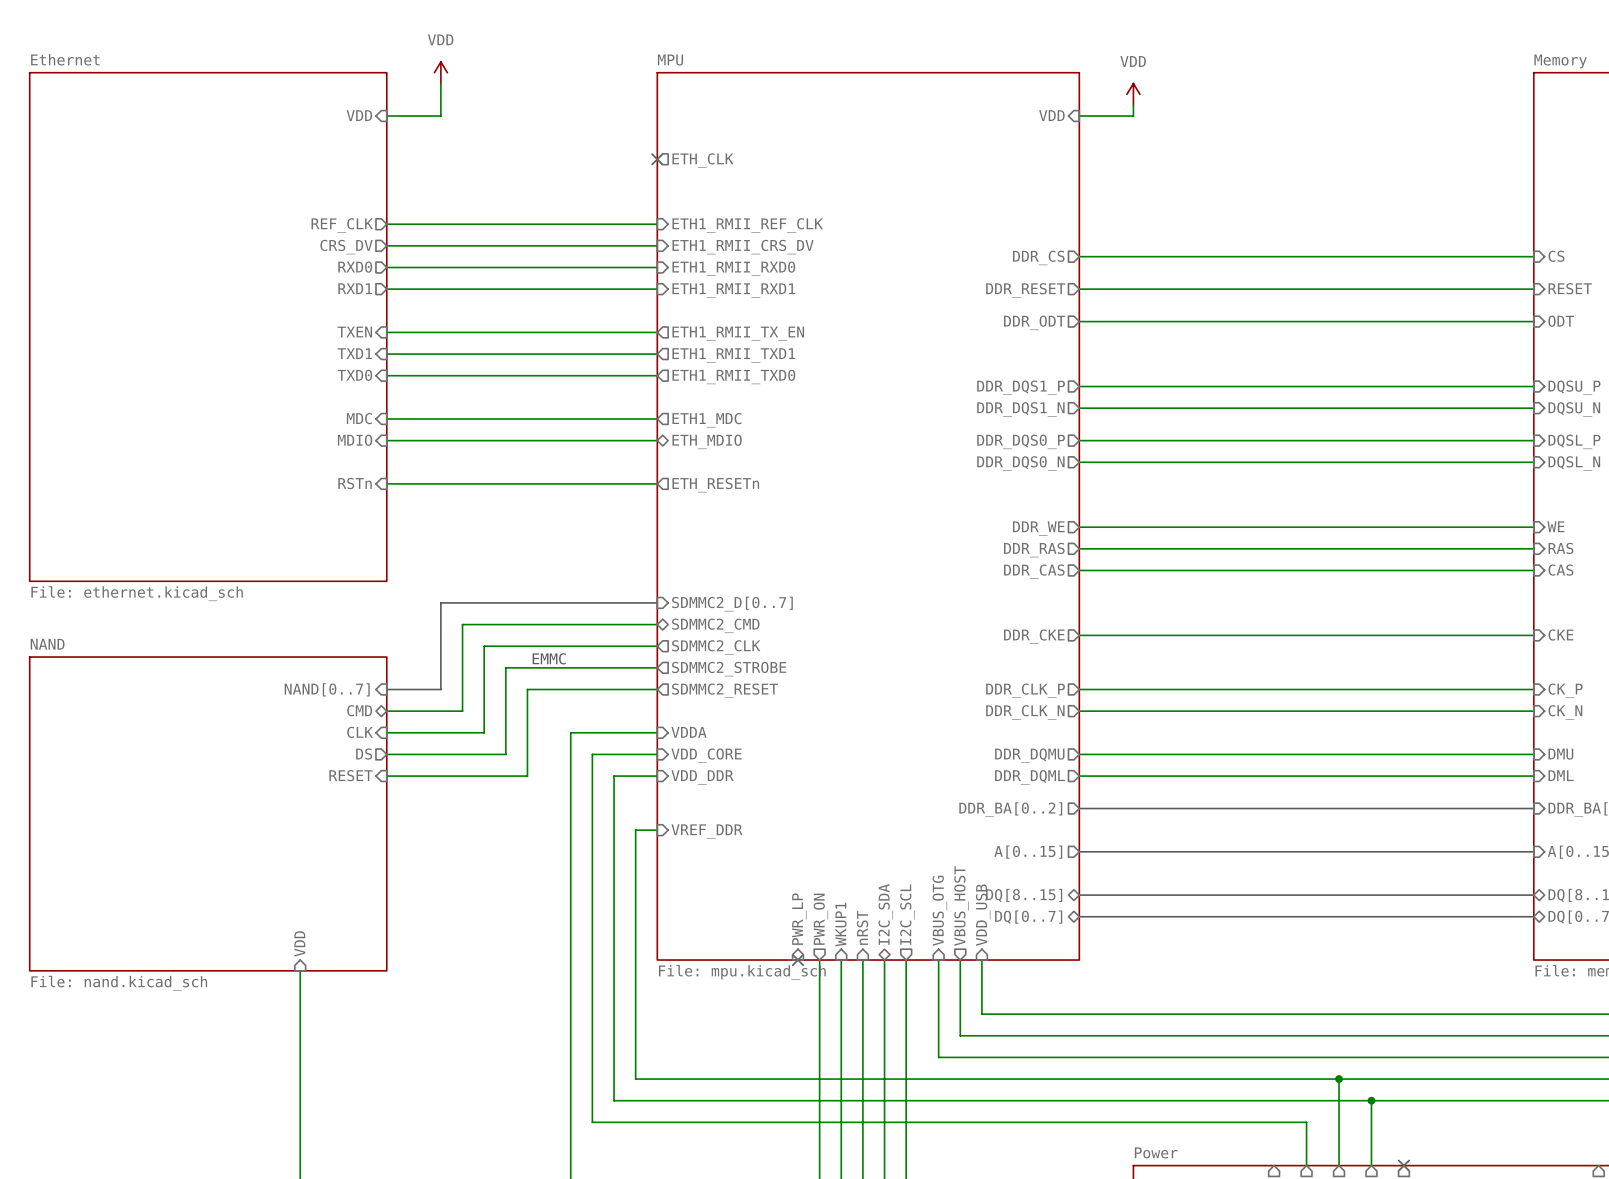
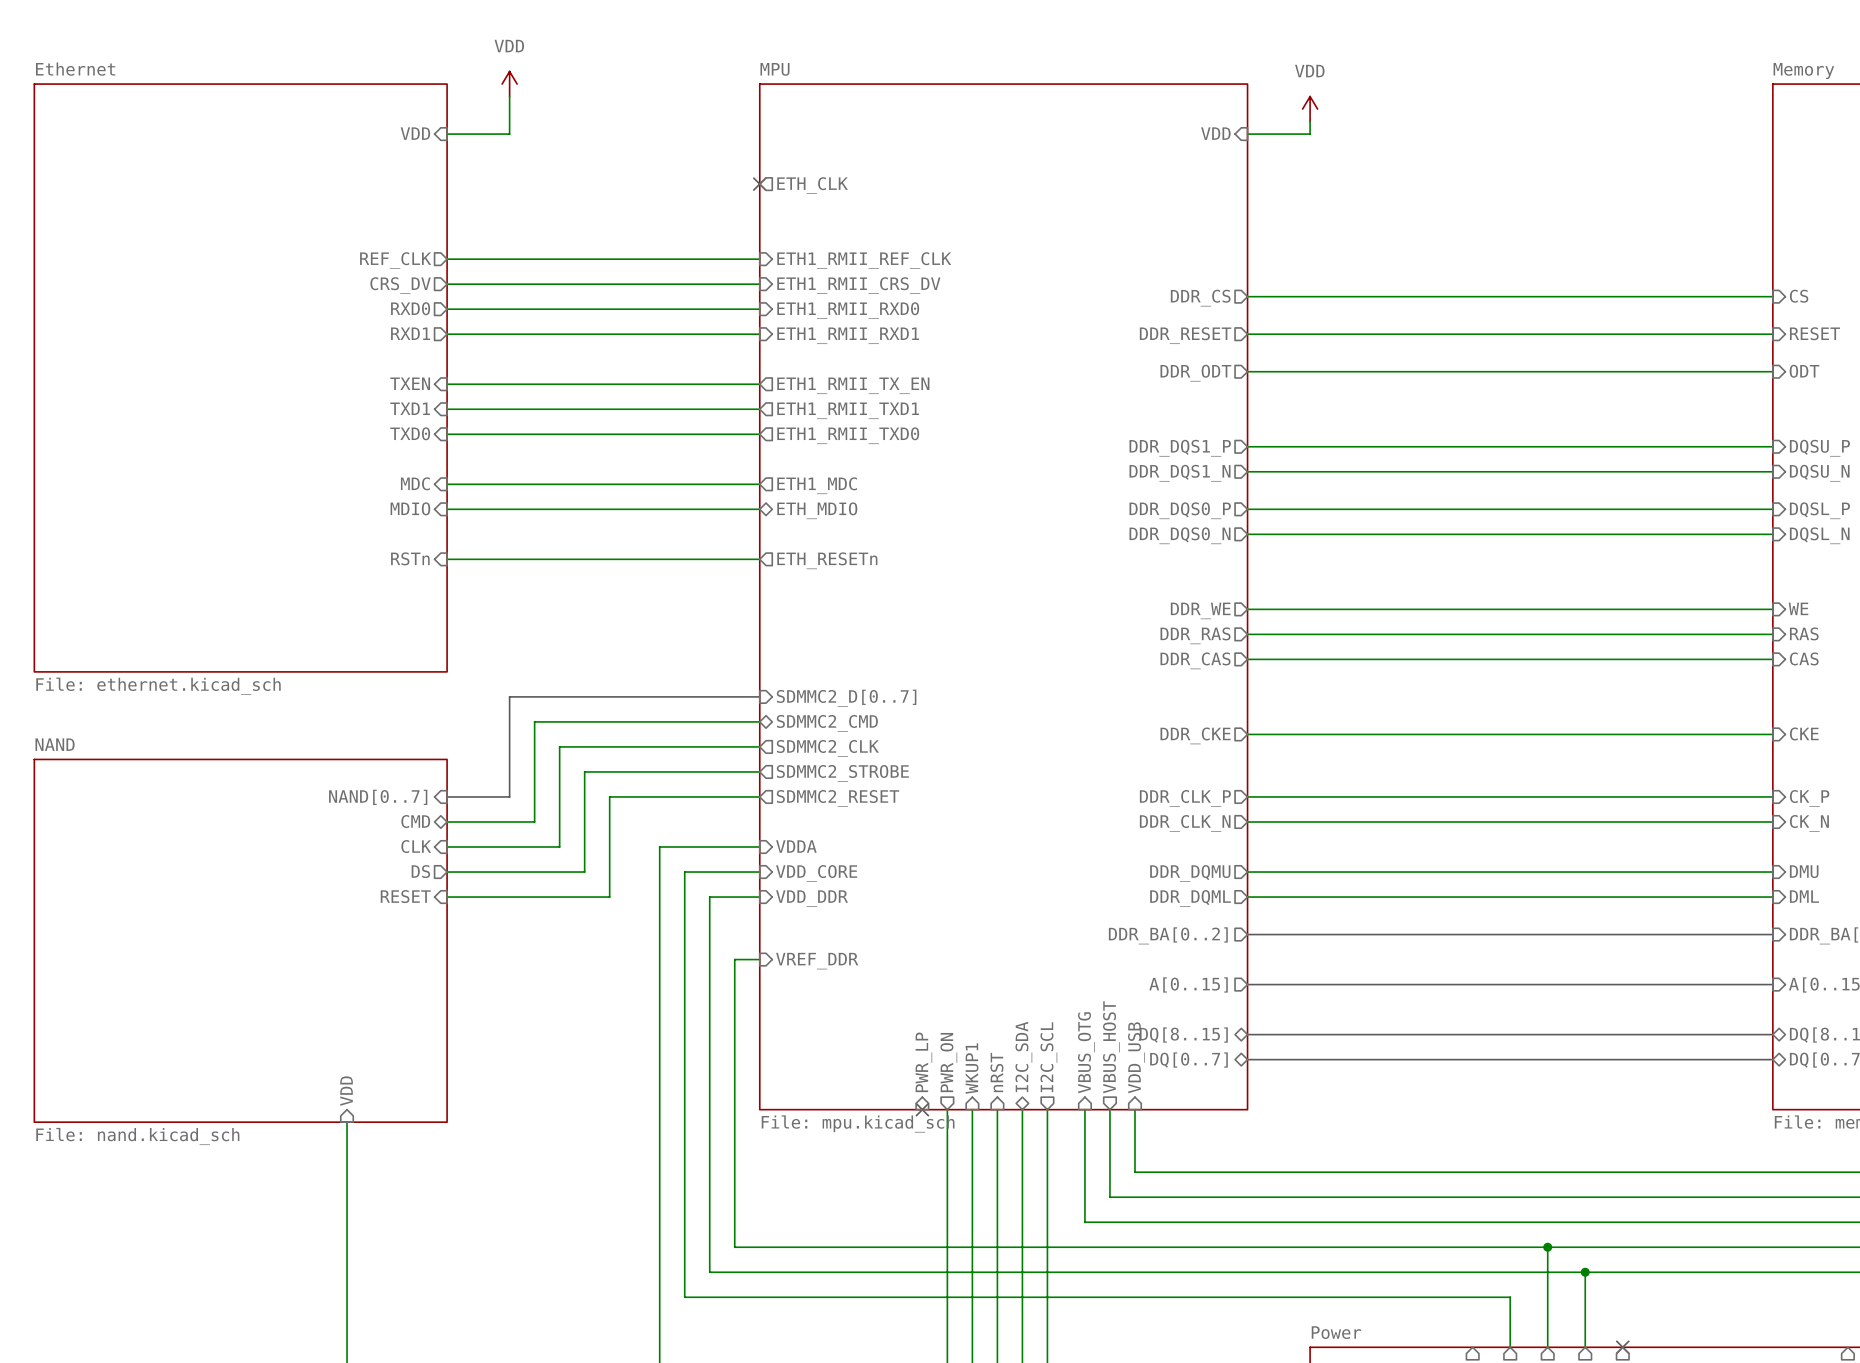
text: EMMC (549, 658) -> none

